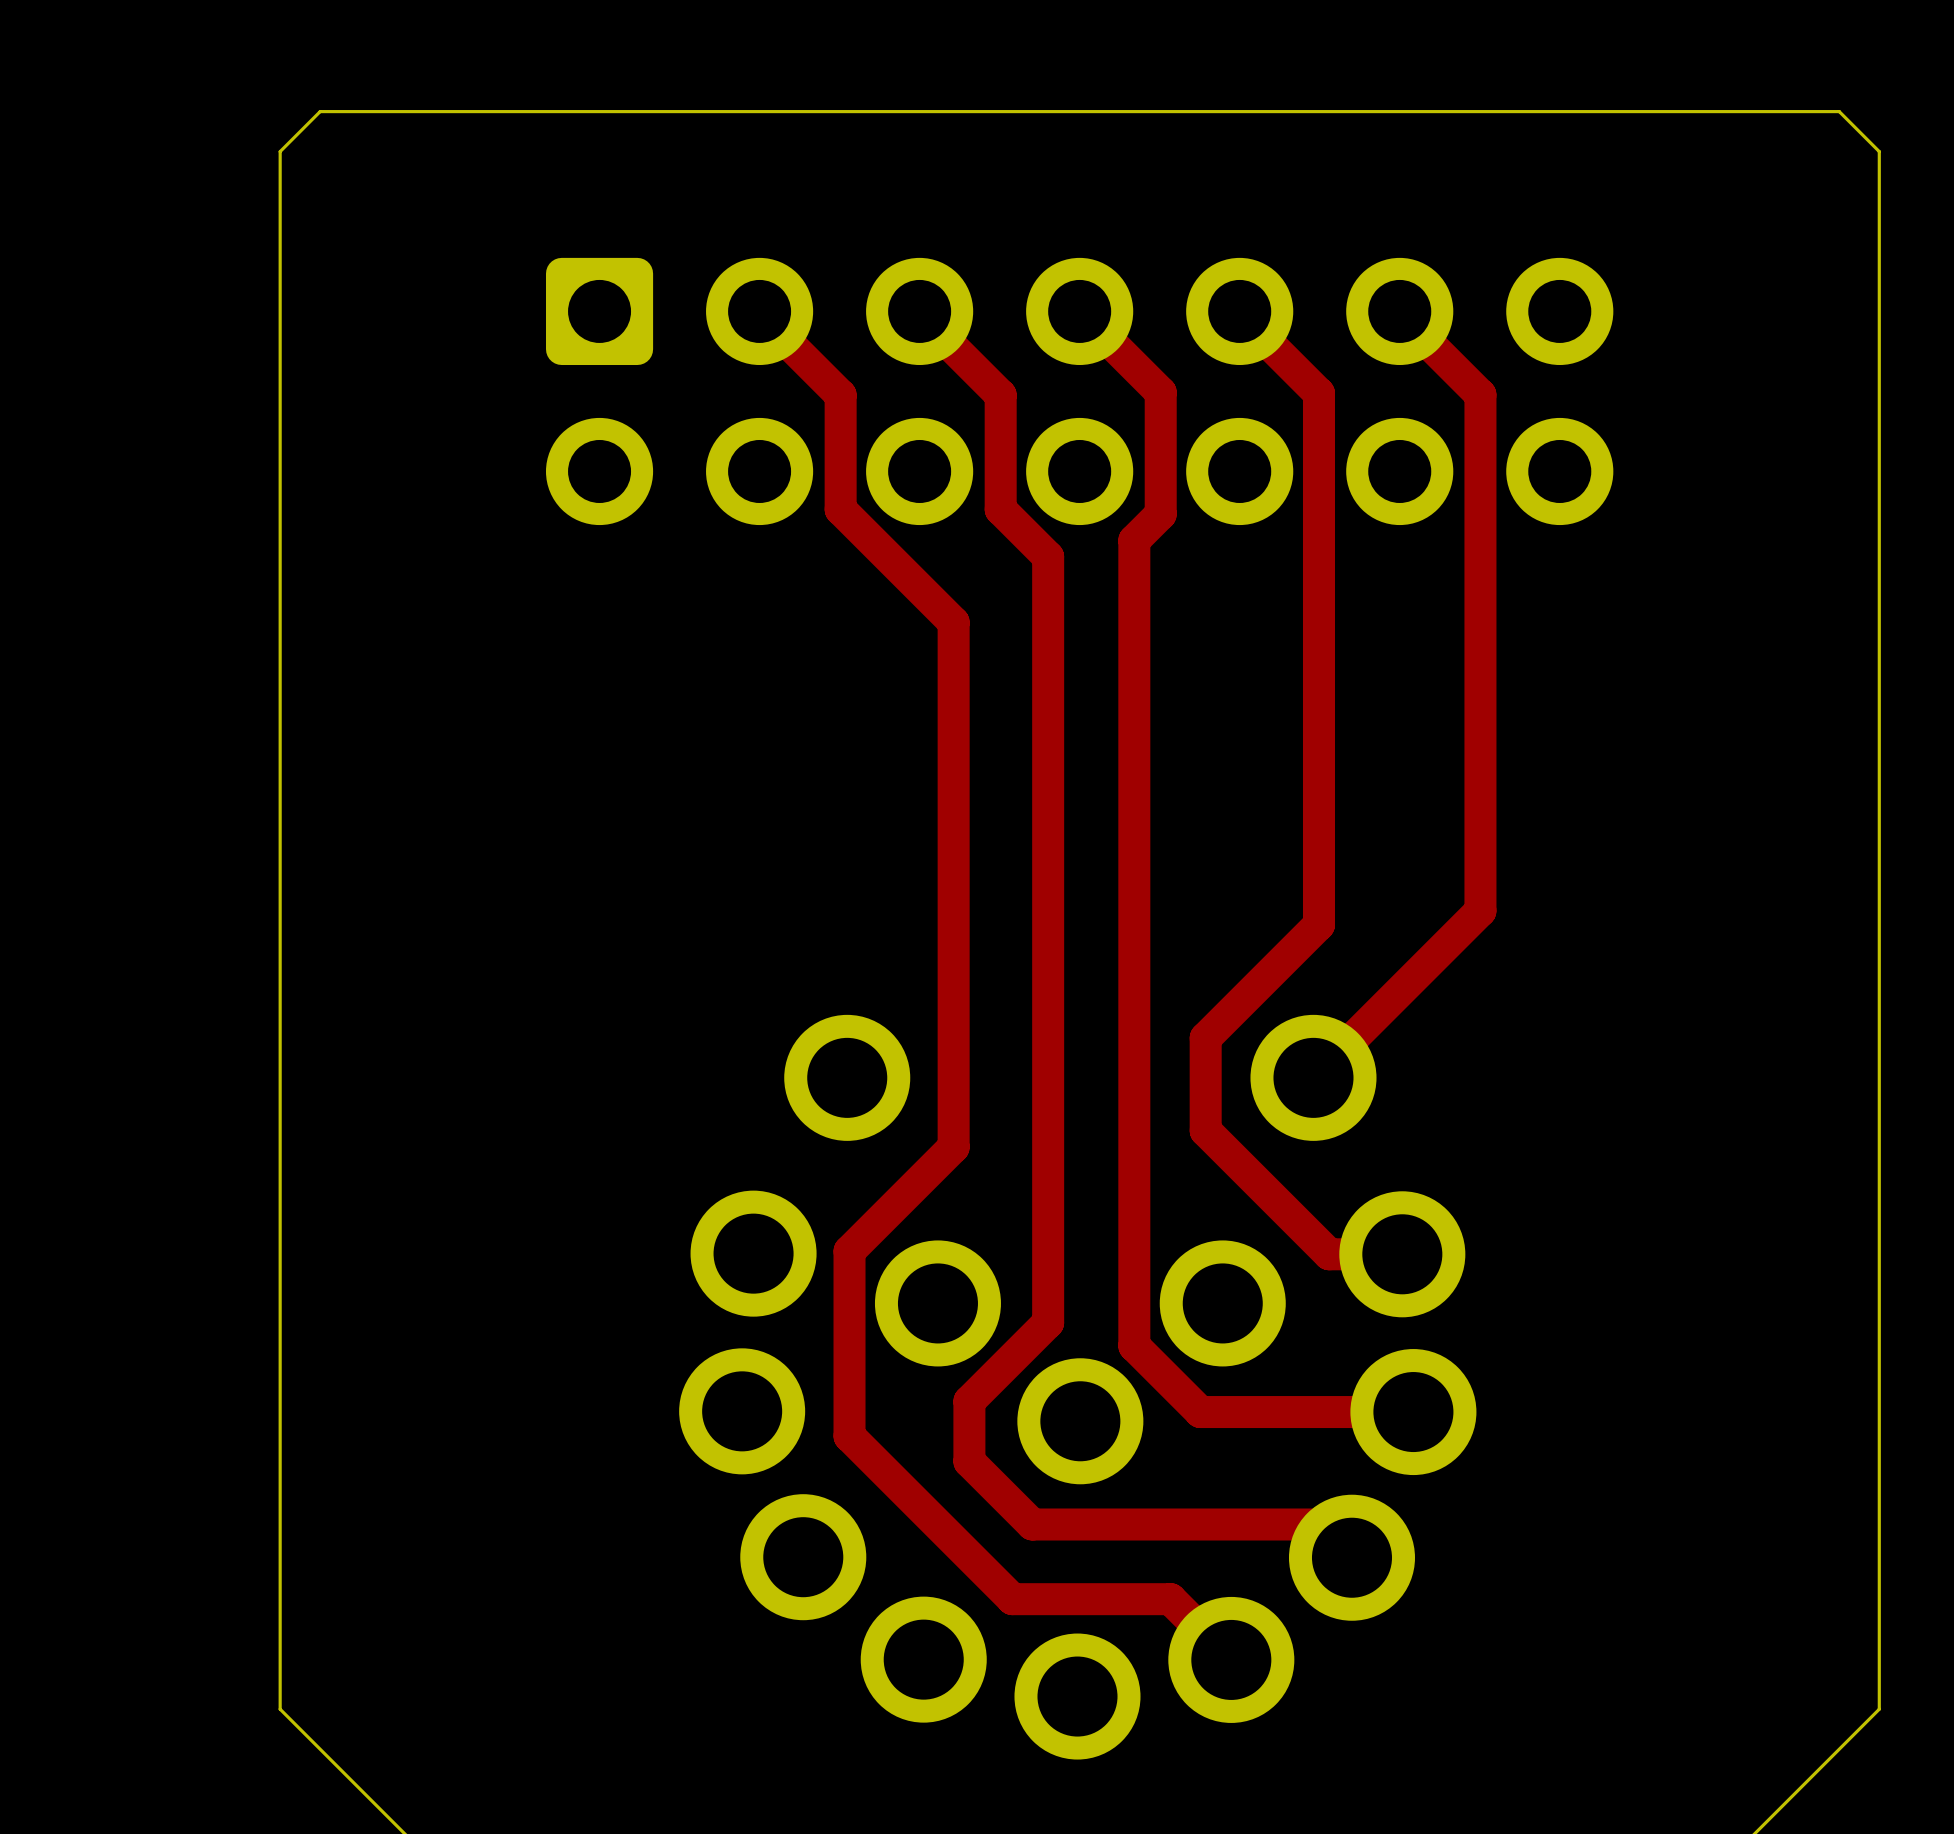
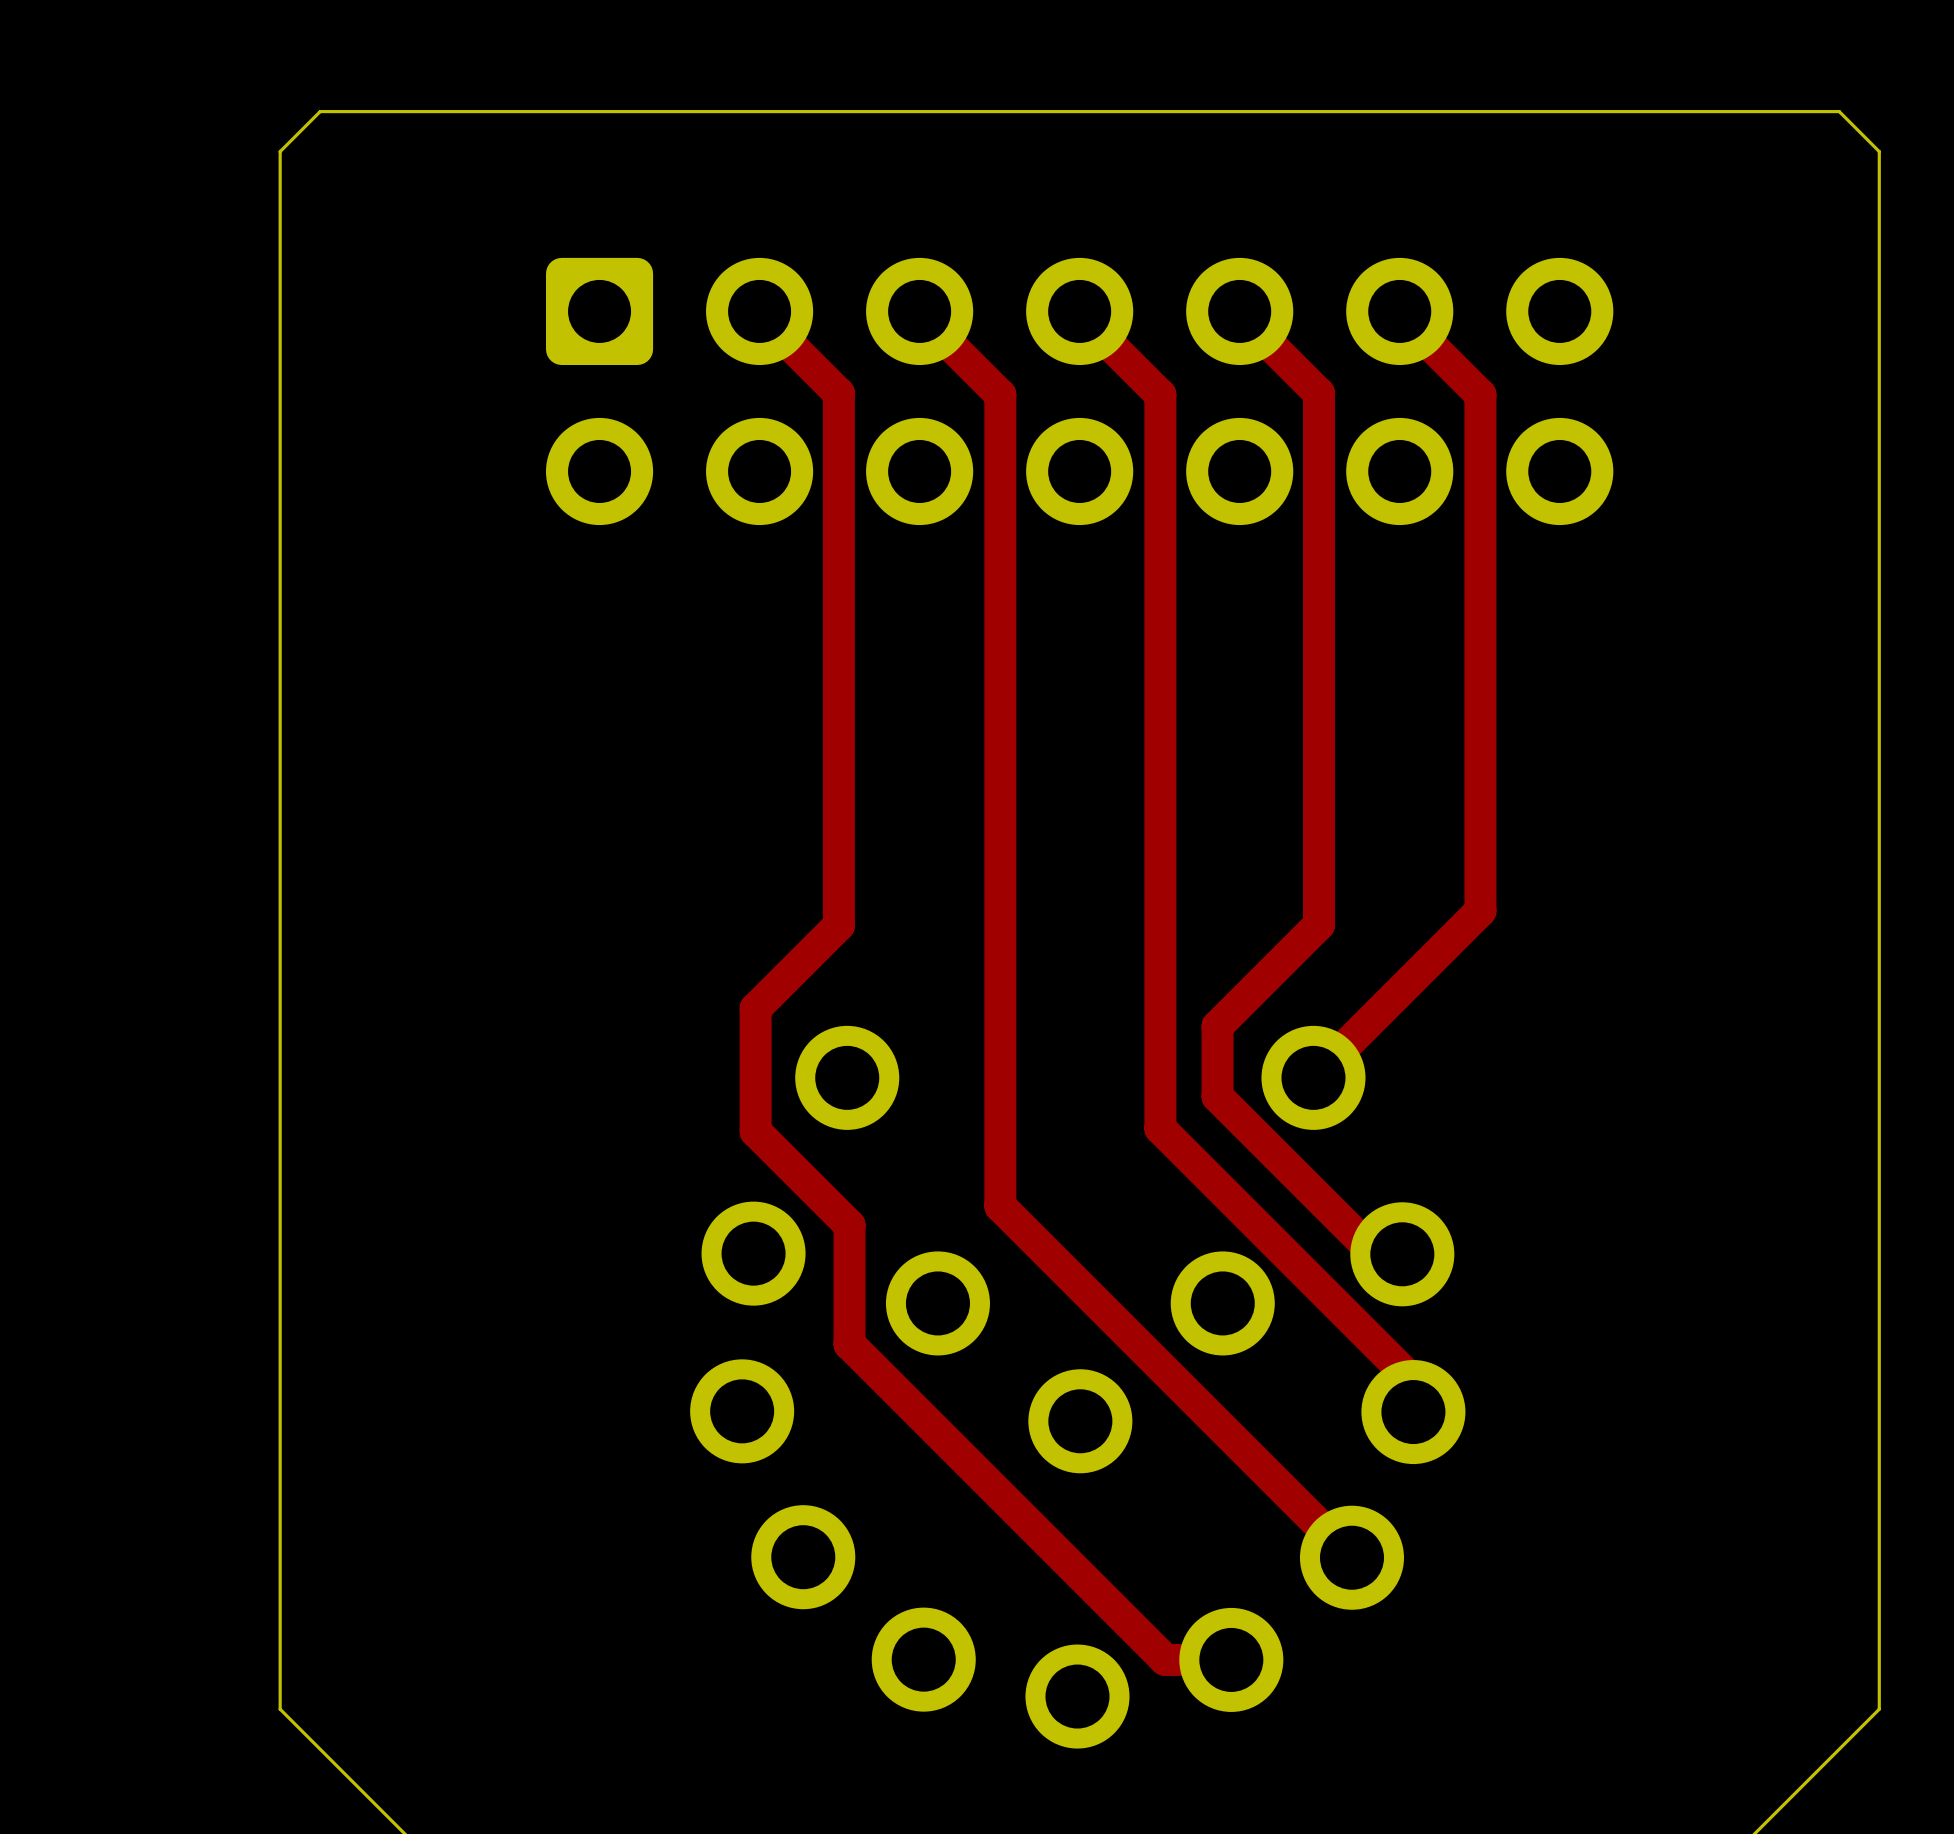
track: (1079, 311) (1160, 392) (1160, 514) (1134, 540) (1134, 1345) (1200, 1412) (1413, 1412) -> (1080, 314) (1160, 394) (1160, 1128) (1413, 1381) (1413, 1412)
track: (838, 393) (840, 395) (840, 509) (953, 622) (953, 1147) (849, 1251) -> (838, 393) (838, 925) (755, 1008) (755, 1131) (849, 1225) (849, 1251)
track: (1000, 395) (1000, 509) (1048, 556) (1048, 1322) (969, 1401) (969, 1461) (1032, 1524) (1318, 1524) -> (1000, 394) (1000, 1206) (1318, 1524)
part footprint: [679, 1014, 1477, 1760] -> [690, 1025, 1466, 1749]
track: (1217, 1026) (1205, 1038) (1205, 1130) (1329, 1254) (1375, 1254) -> (1217, 1026) (1217, 1096) (1375, 1254)
track: (849, 1344) (849, 1436) (1012, 1599) (1170, 1599) (1231, 1659) -> (849, 1344) (1165, 1659) (1231, 1659)

